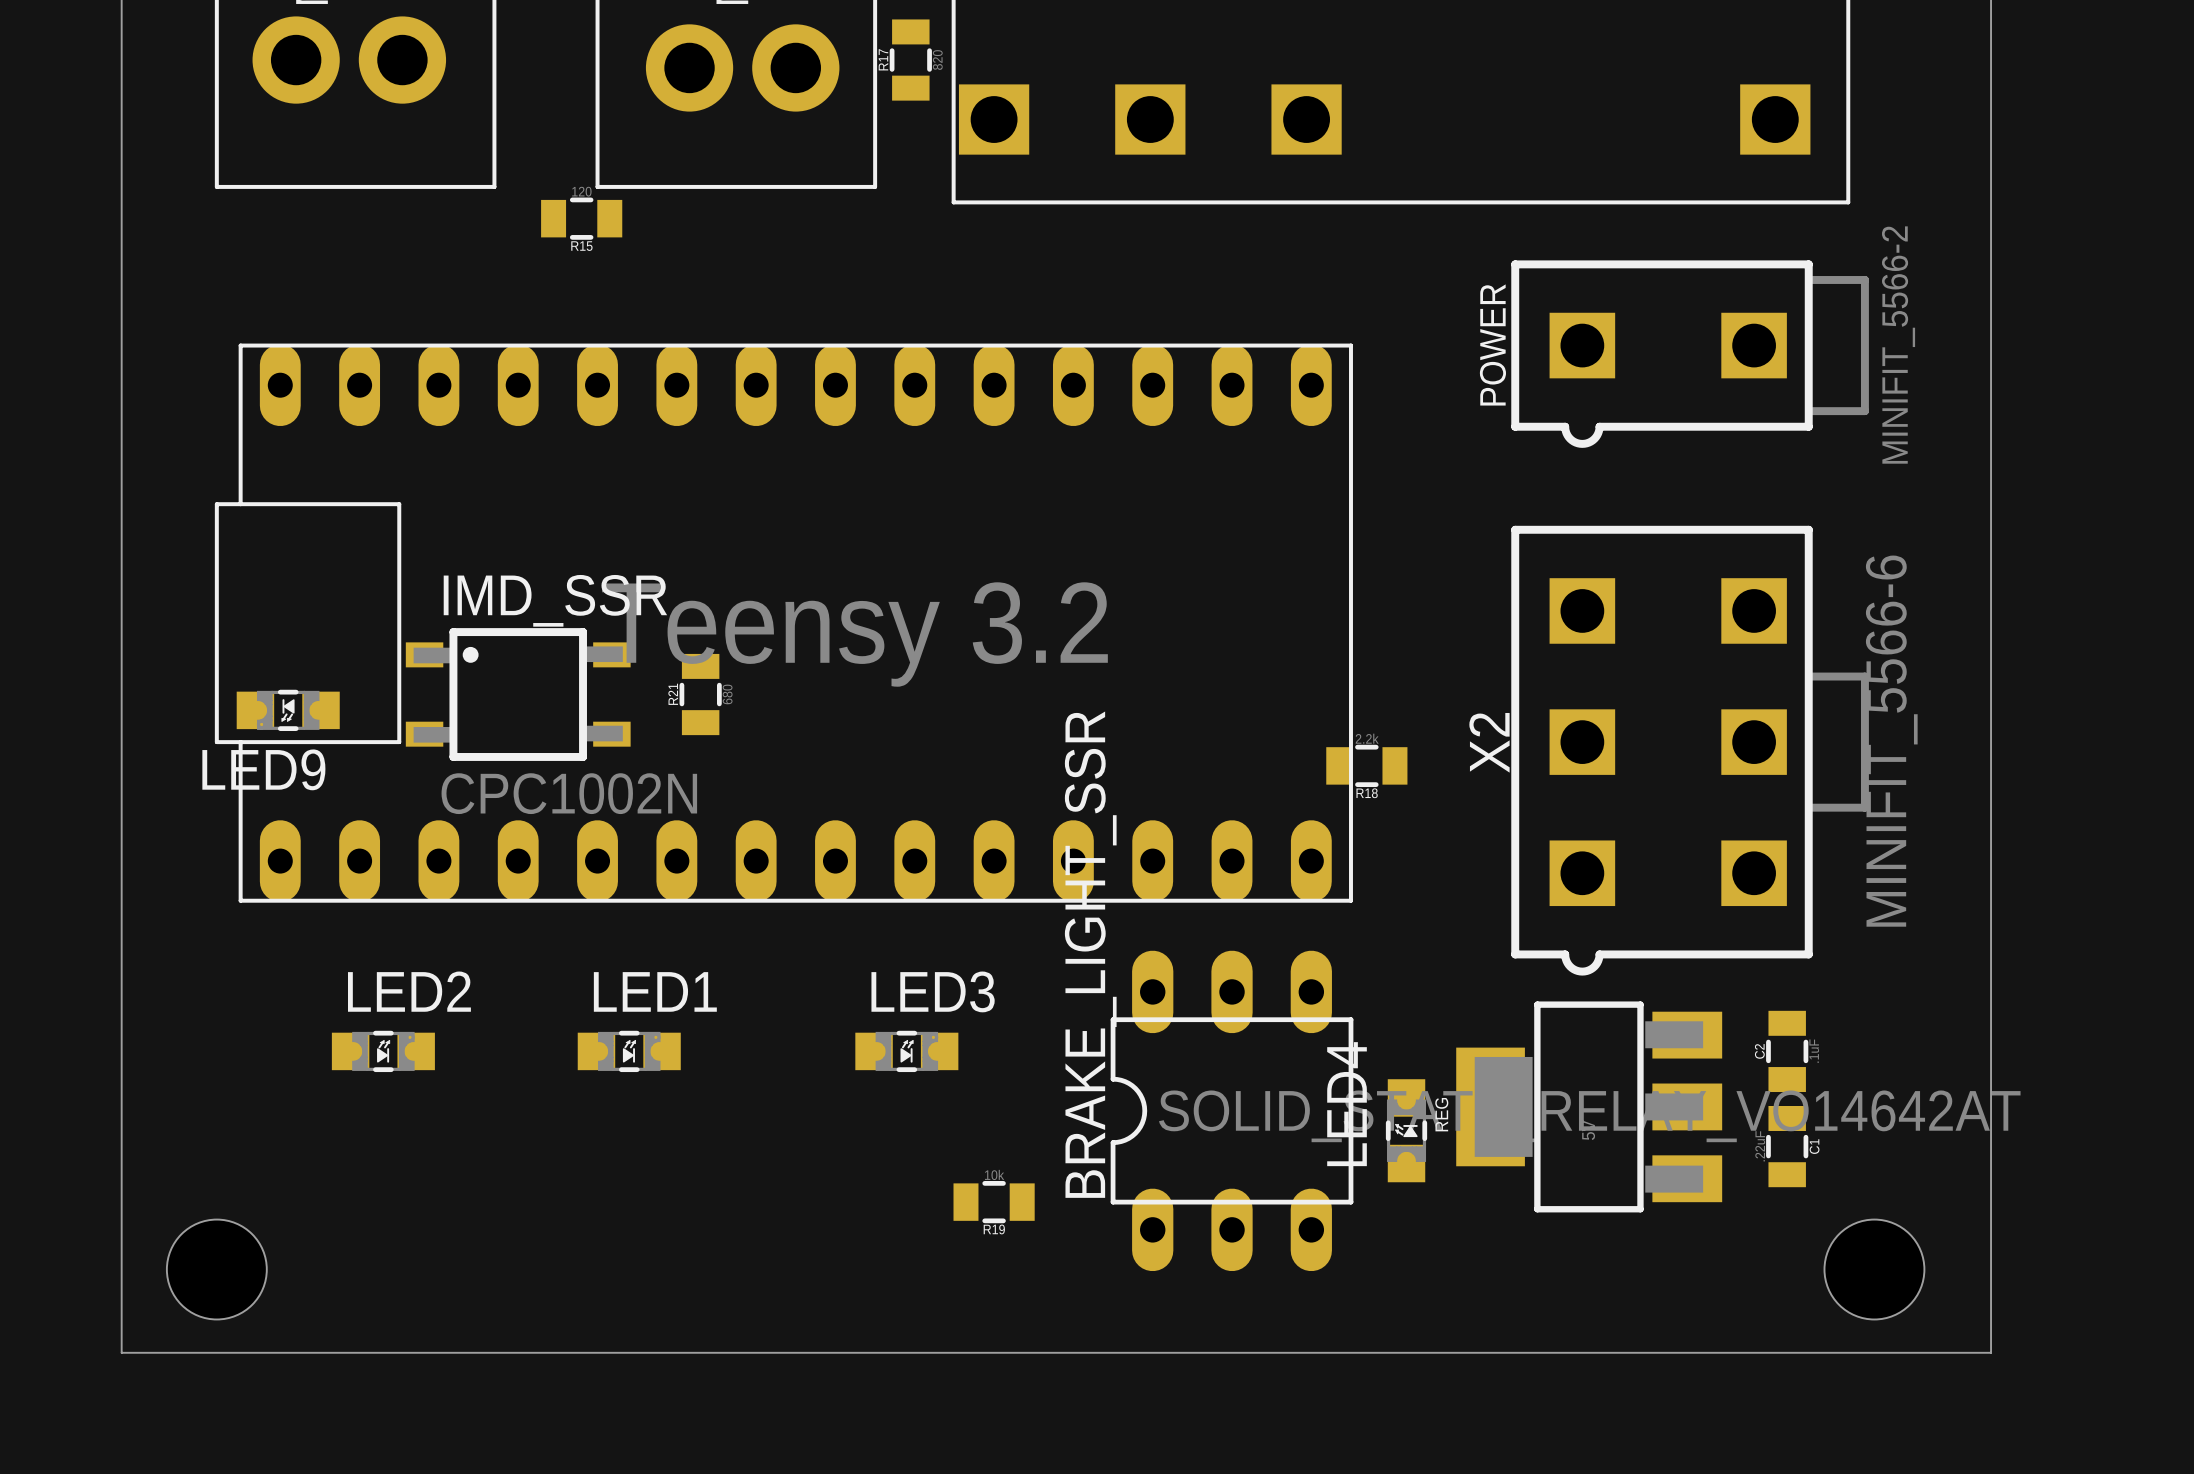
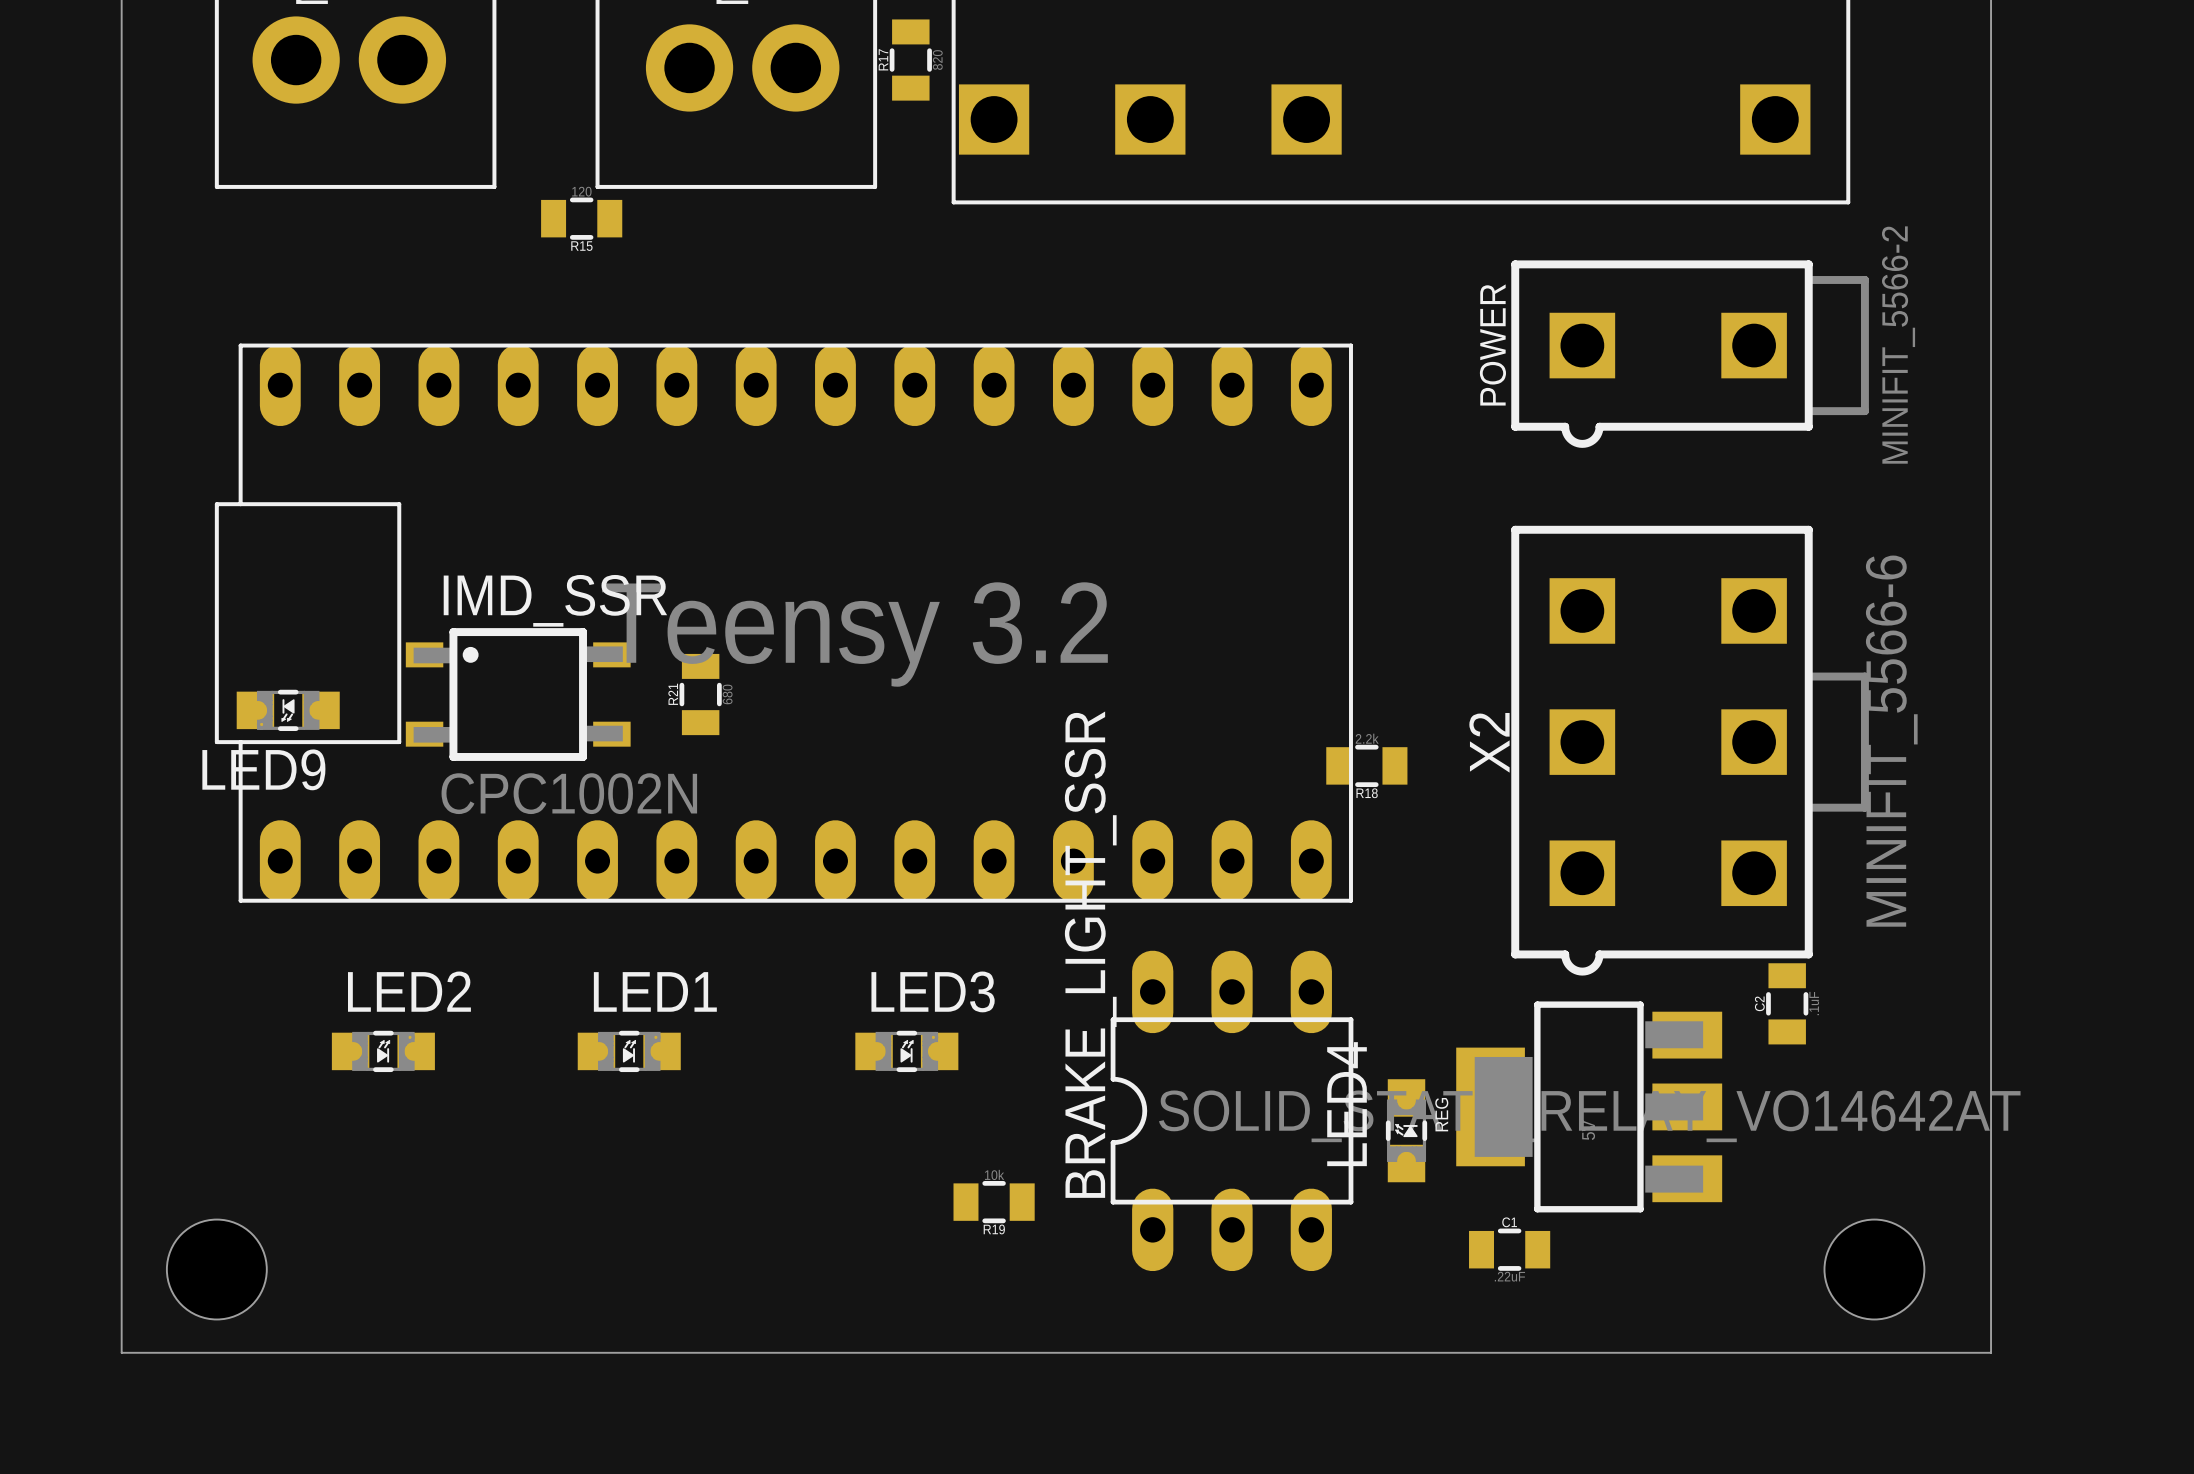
C2 position: (1787, 1051) -> (1787, 1003)
C1 rotation: 0° (1787, 1146) -> 90° clockwise (1509, 1249)
C1 position: (1787, 1146) -> (1509, 1249)

